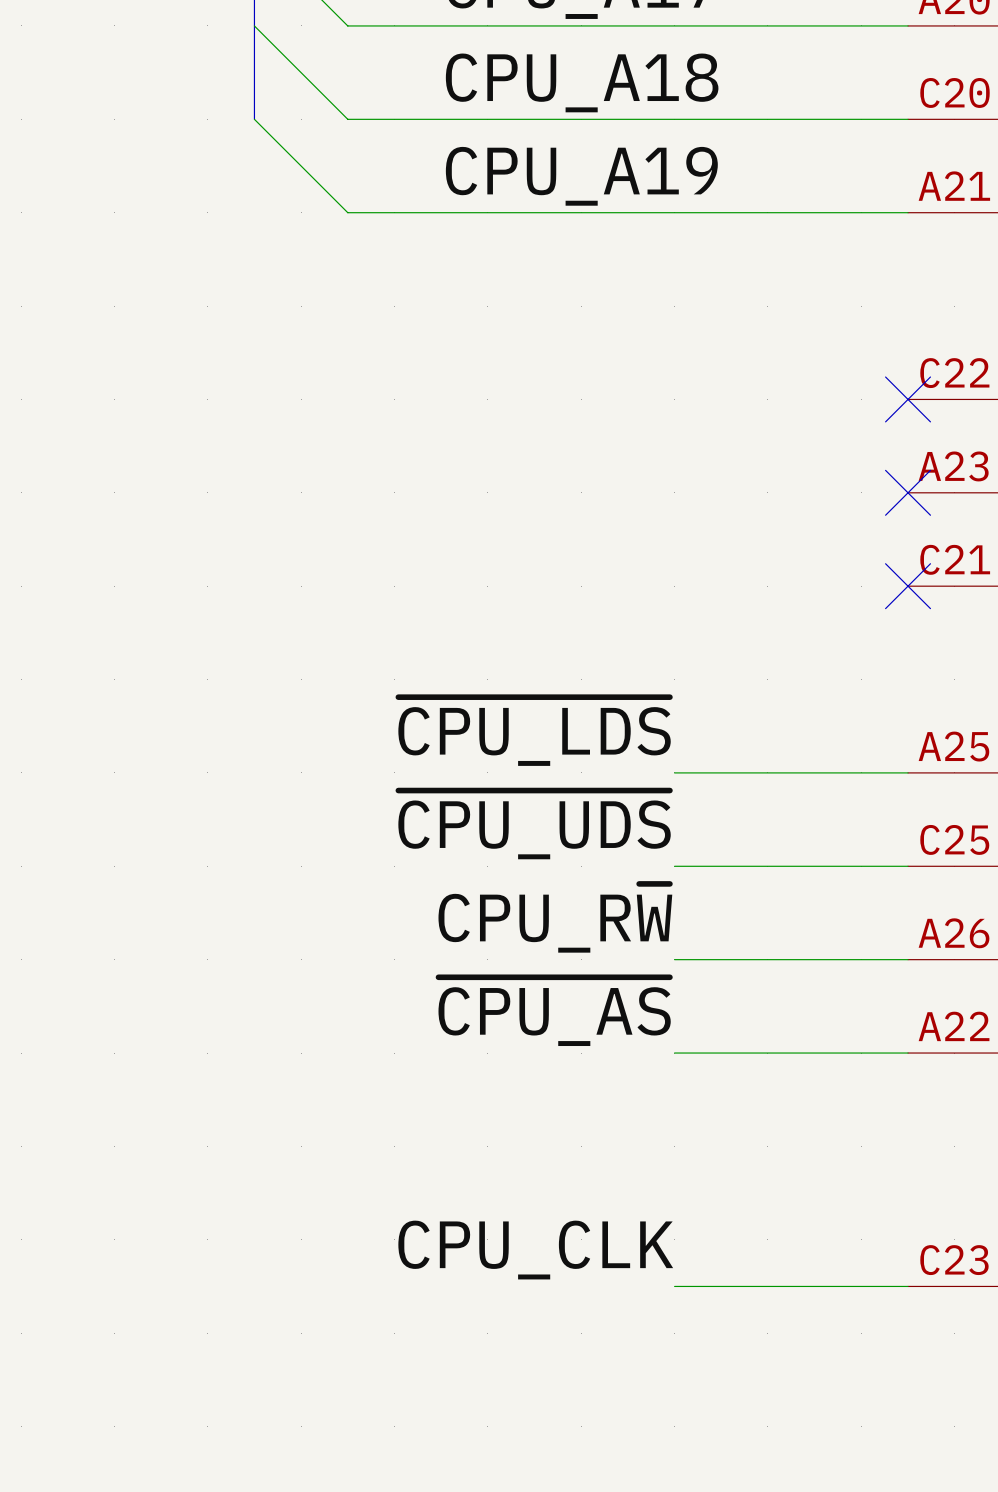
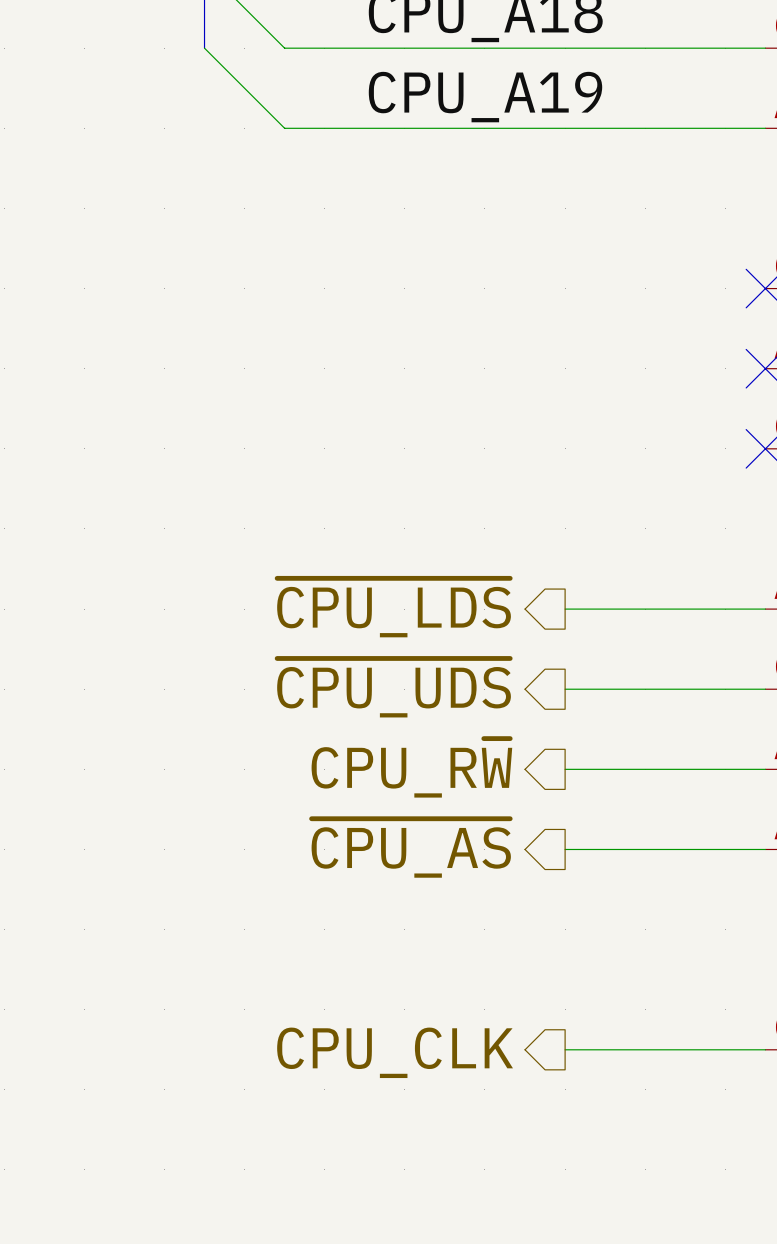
label: ~{CPU_LDS} (534, 731) -> none
hierarchical label: none -> ~{CPU_LDS} (394, 607)
label: ~{CPU_UDS} (534, 824) -> none
hierarchical label: none -> ~{CPU_UDS} (394, 687)
label: CPU_R~{W} (555, 918) -> none
hierarchical label: none -> CPU_R~{W} (411, 768)
label: ~{CPU_AS} (554, 1011) -> none
hierarchical label: none -> ~{CPU_AS} (411, 848)
label: CPU_CLK (535, 1250) -> none
hierarchical label: none -> CPU_CLK (395, 1052)

